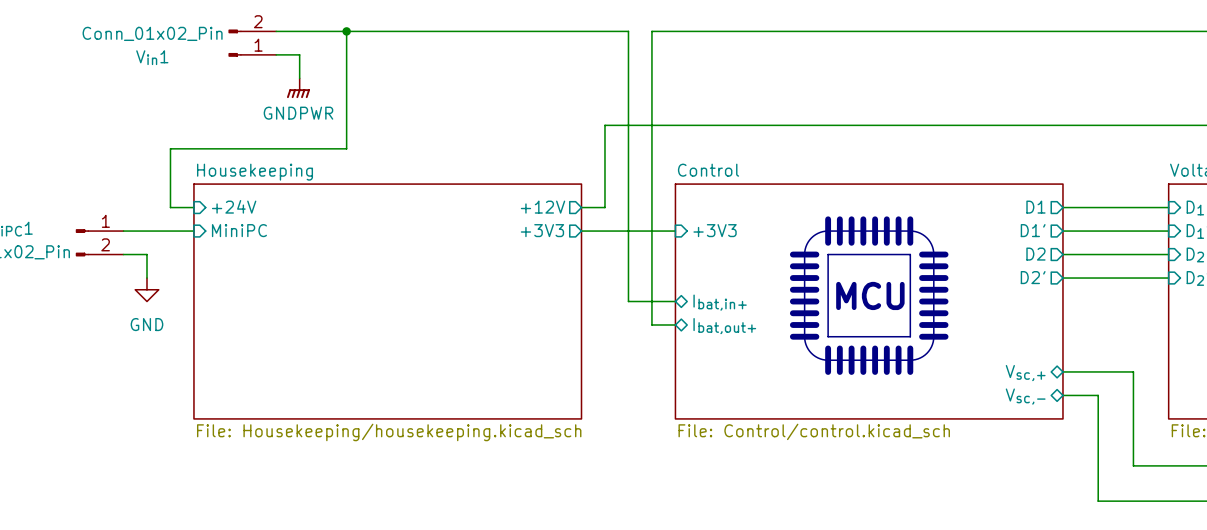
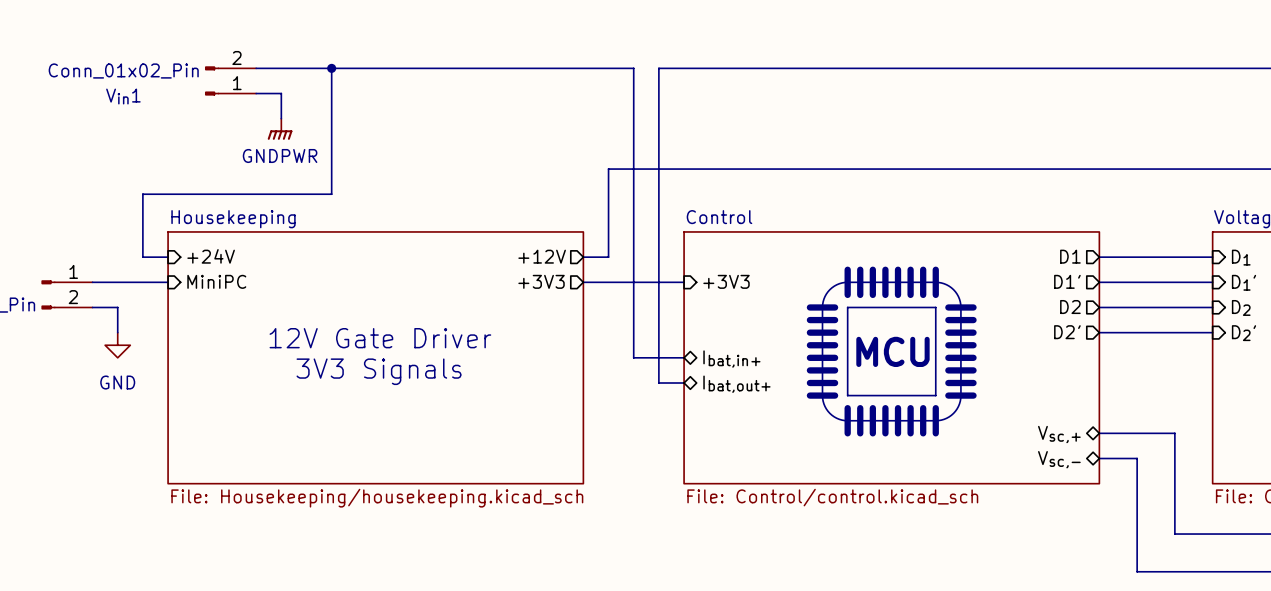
text: none -> 12V Gate Driver (380, 338)
text: none -> 3V3 Signals (379, 371)

